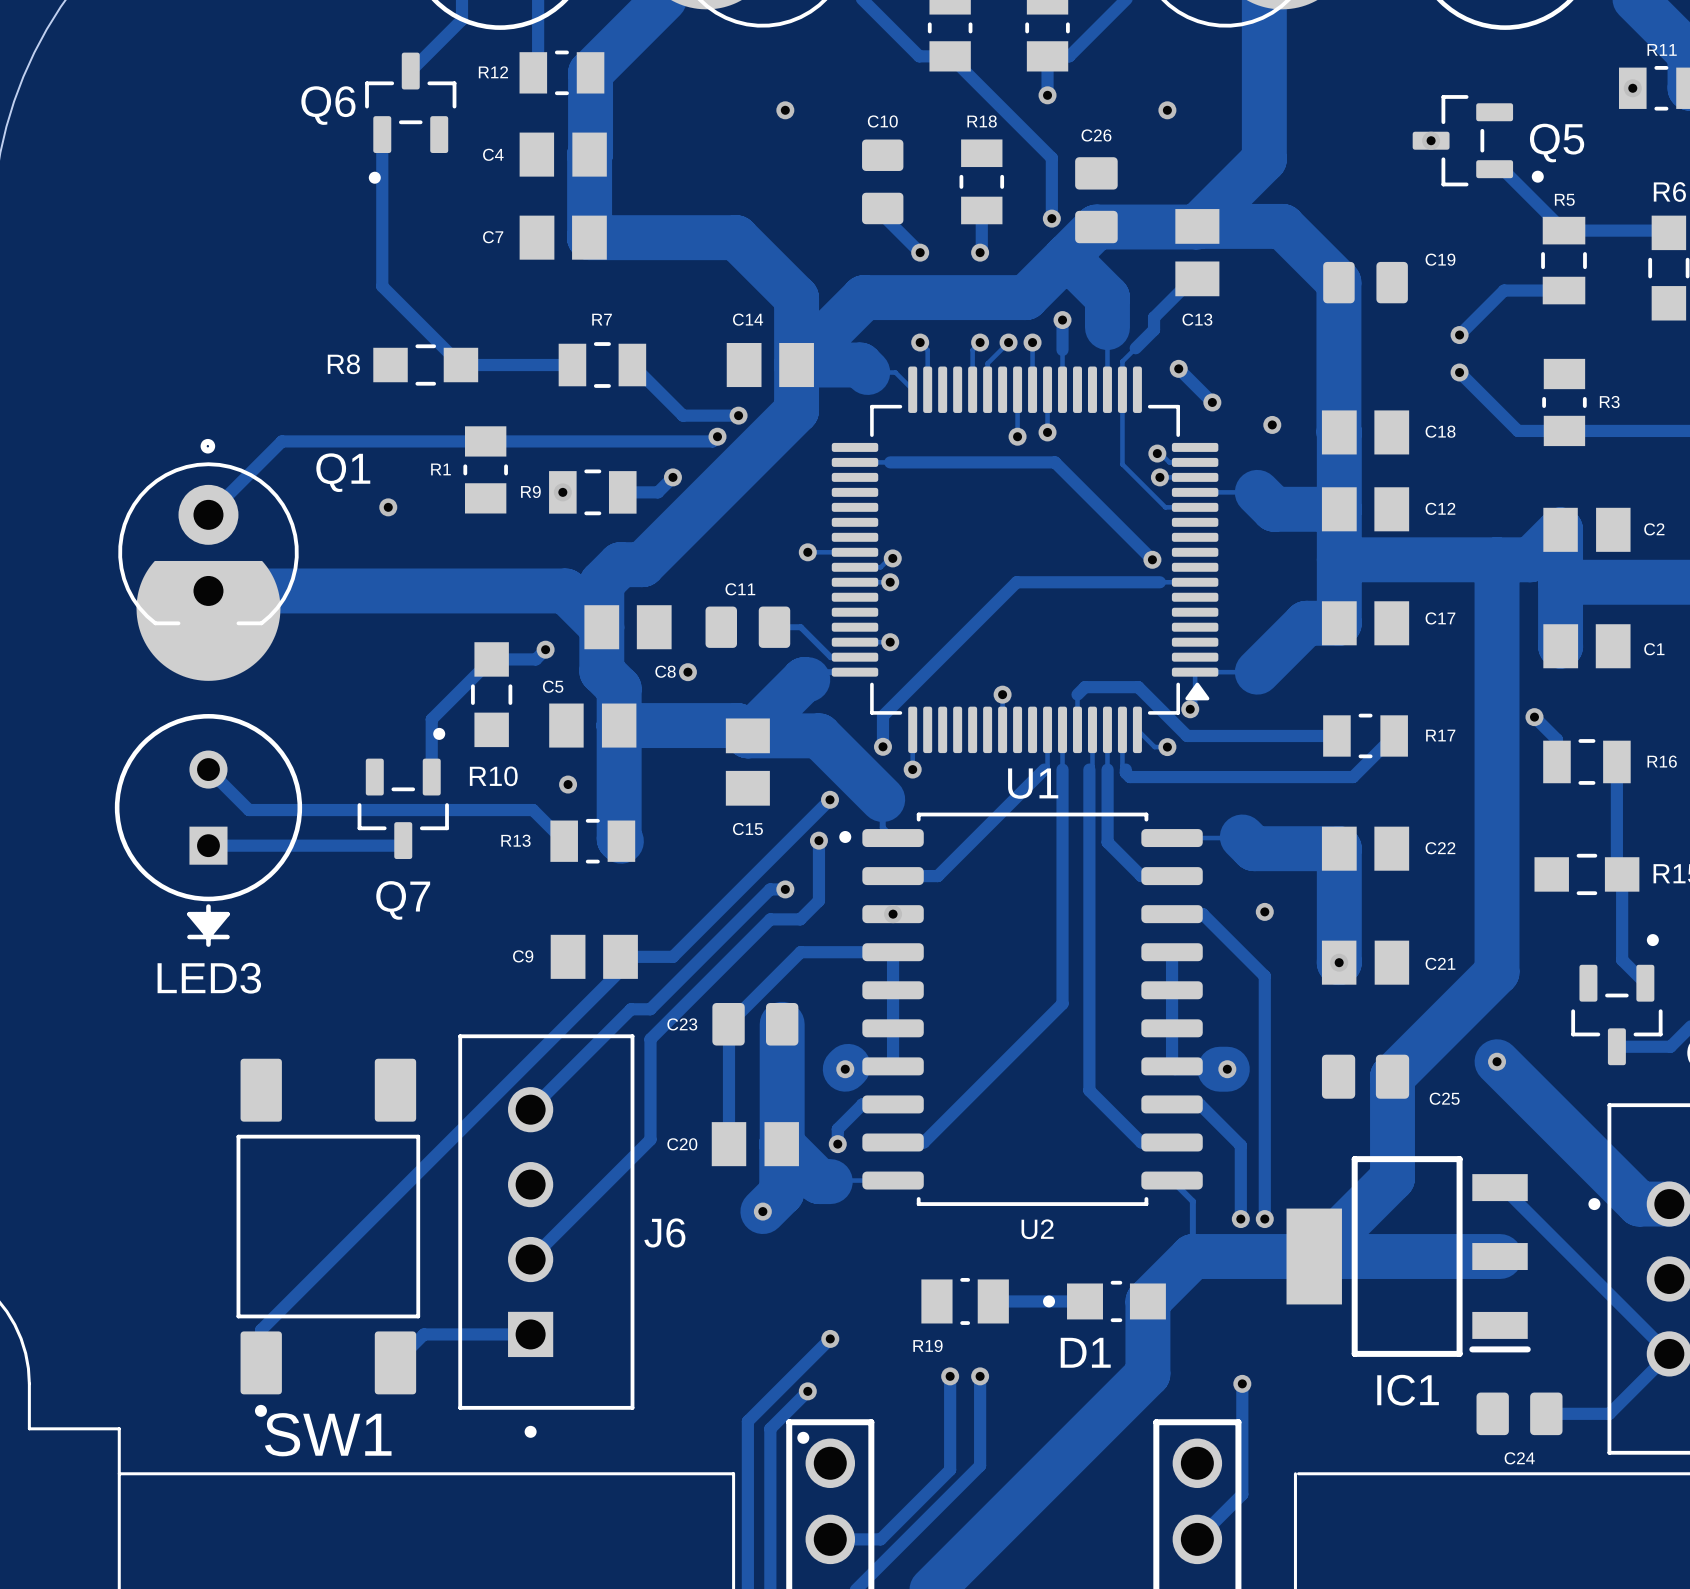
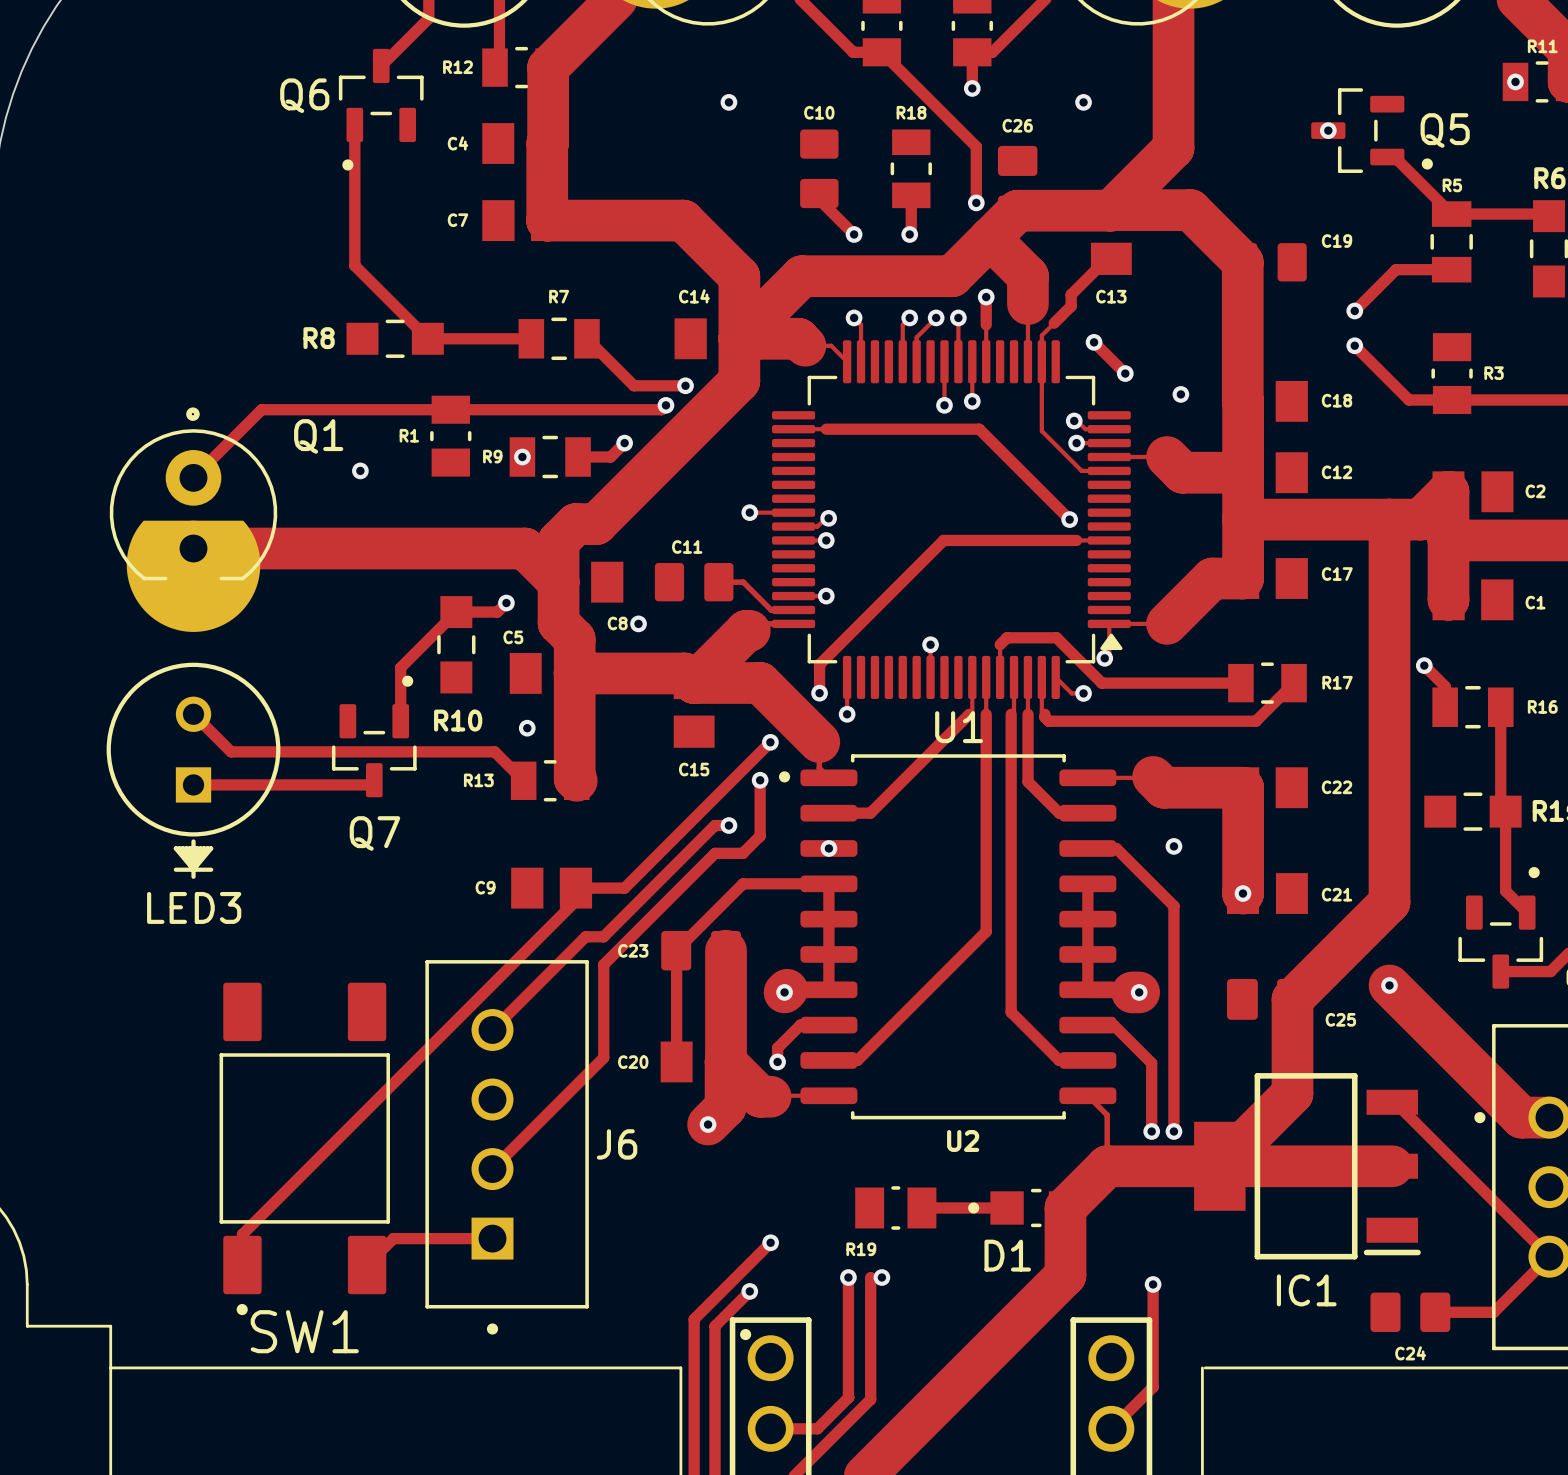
track: (950, 1376) (950, 1469) (914, 1505) -> (848, 1277) (848, 1397)
track: (980, 1376) (980, 1465) (938, 1507) -> (870, 1277) (870, 1399)
via position: (980, 1376) -> (848, 1277)

